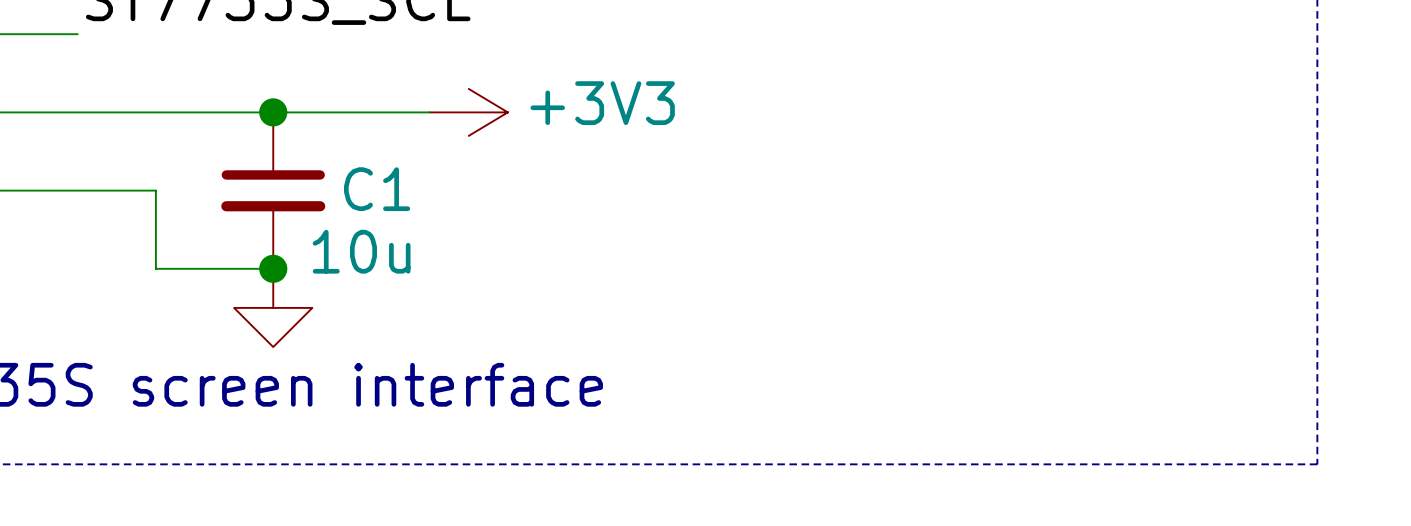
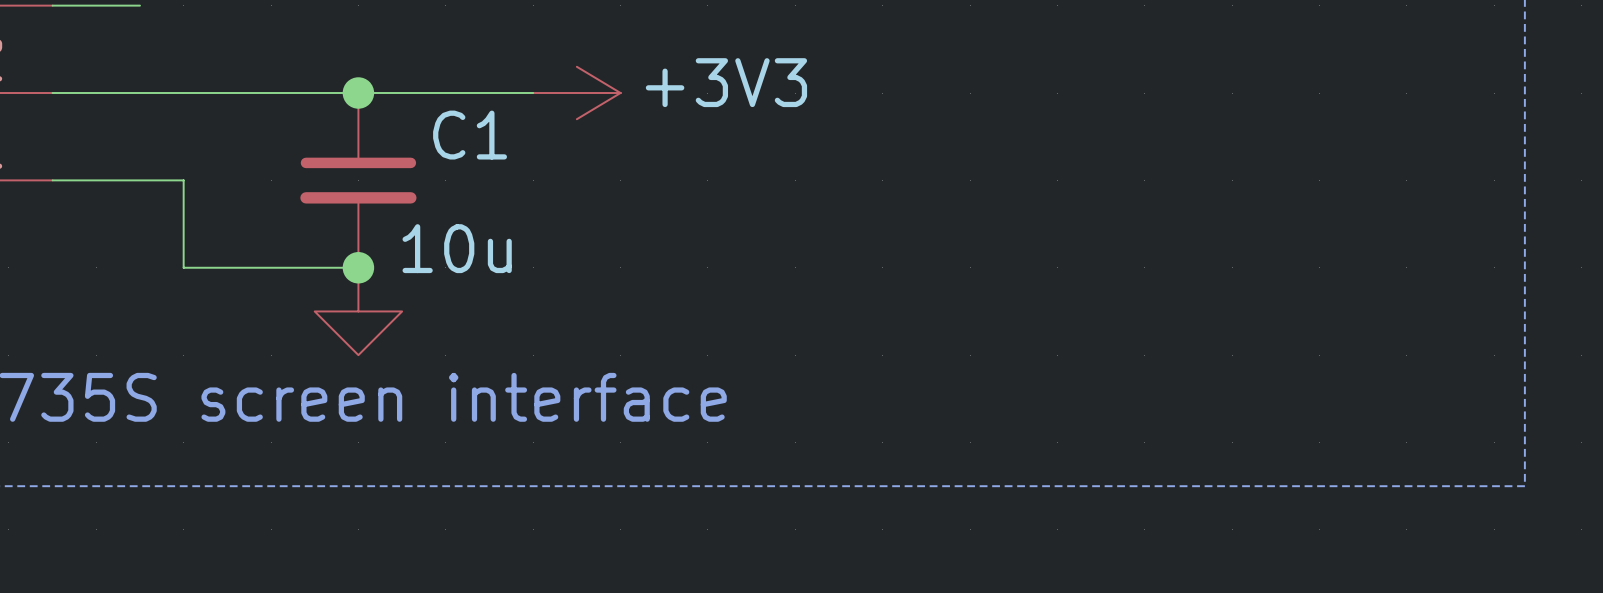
C1 name position: C1 (377, 189) -> C1 (470, 135)
wire: (116, 190) (155, 190) (155, 268) -> (183, 180) (183, 267) (227, 267)

